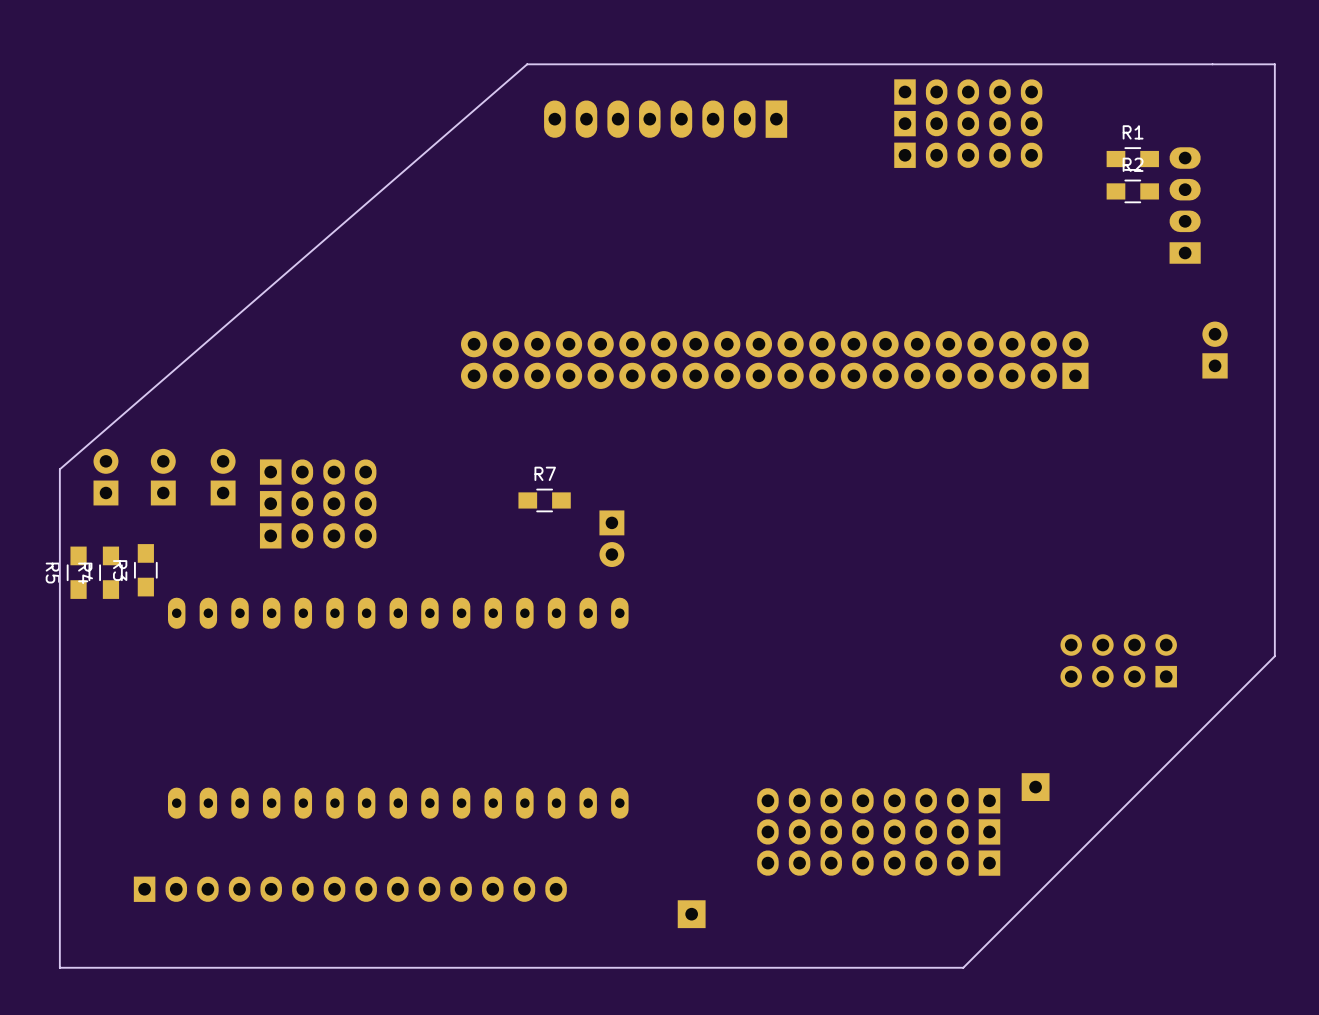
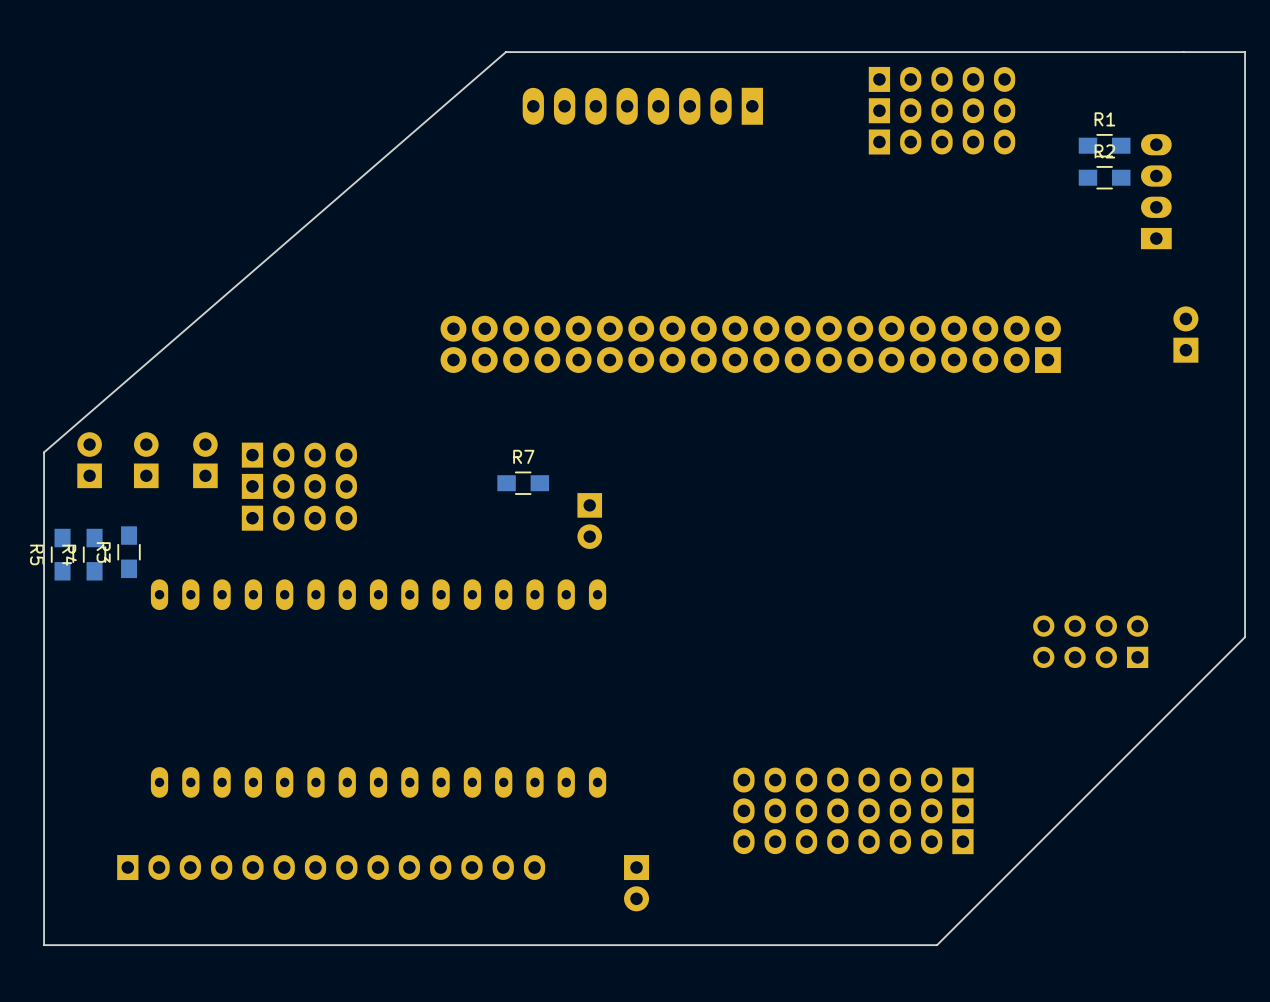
part: (1035, 787) -> none
part: none -> (636, 883)
part: (691, 914) -> none

